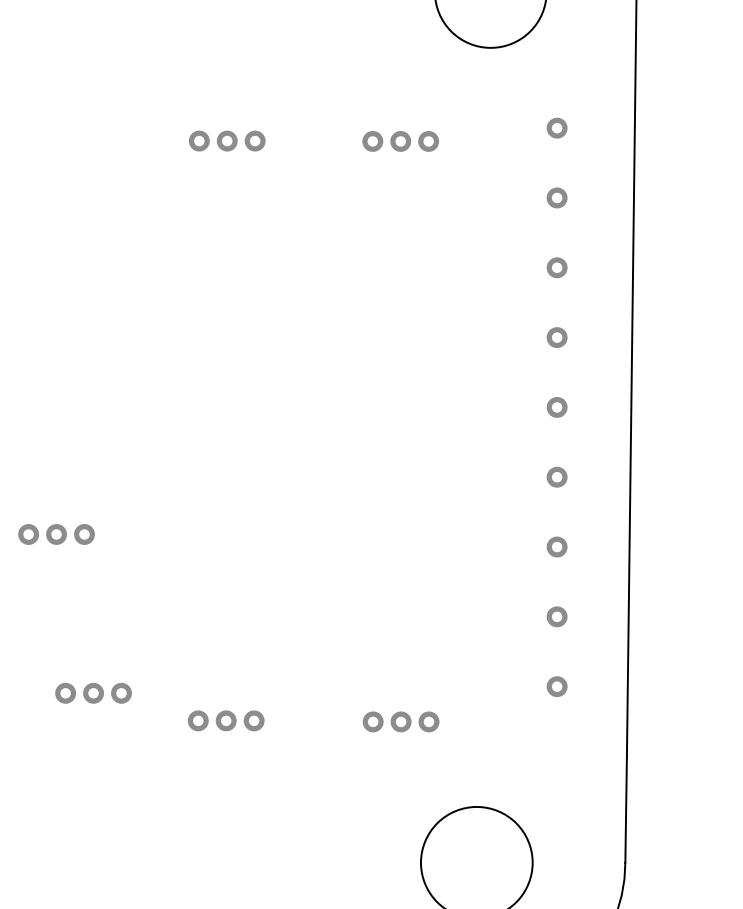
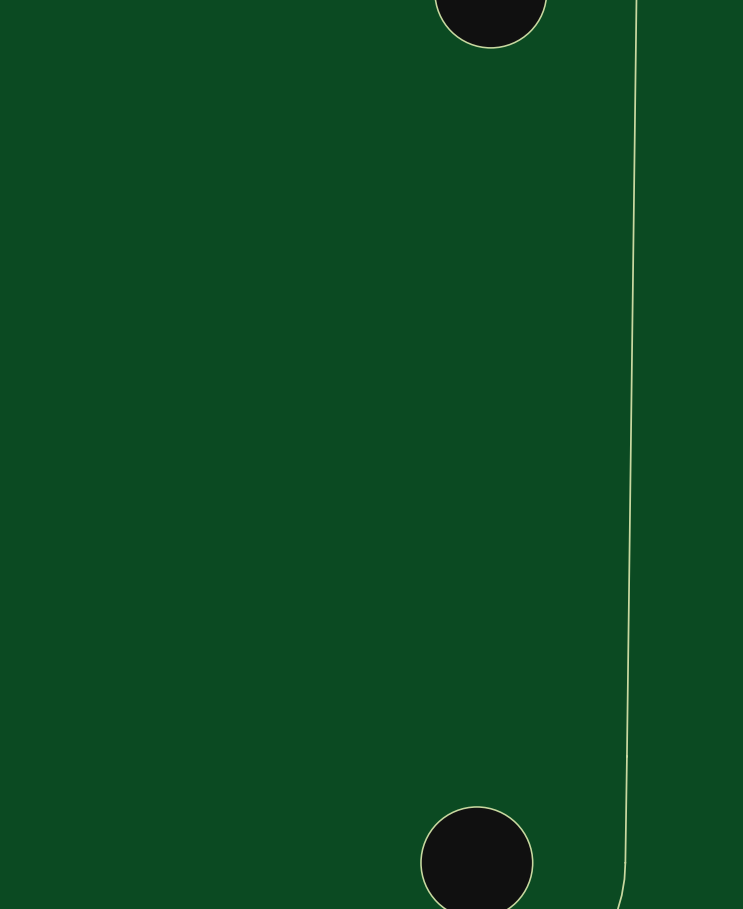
via: (557, 128) -> none
via: (199, 141) -> none
via: (227, 141) -> none
via: (255, 141) -> none
via: (372, 141) -> none
via: (400, 141) -> none
via: (428, 141) -> none
via: (557, 197) -> none
via: (557, 267) -> none
via: (557, 337) -> none
via: (557, 407) -> none
via: (557, 477) -> none
via: (28, 534) -> none
via: (56, 534) -> none
via: (84, 534) -> none
via: (557, 547) -> none
via: (557, 616) -> none
via: (557, 686) -> none
via: (65, 693) -> none
via: (93, 693) -> none
via: (121, 693) -> none
via: (198, 720) -> none
via: (226, 720) -> none
via: (254, 720) -> none
via: (373, 721) -> none
via: (401, 721) -> none
via: (429, 721) -> none

